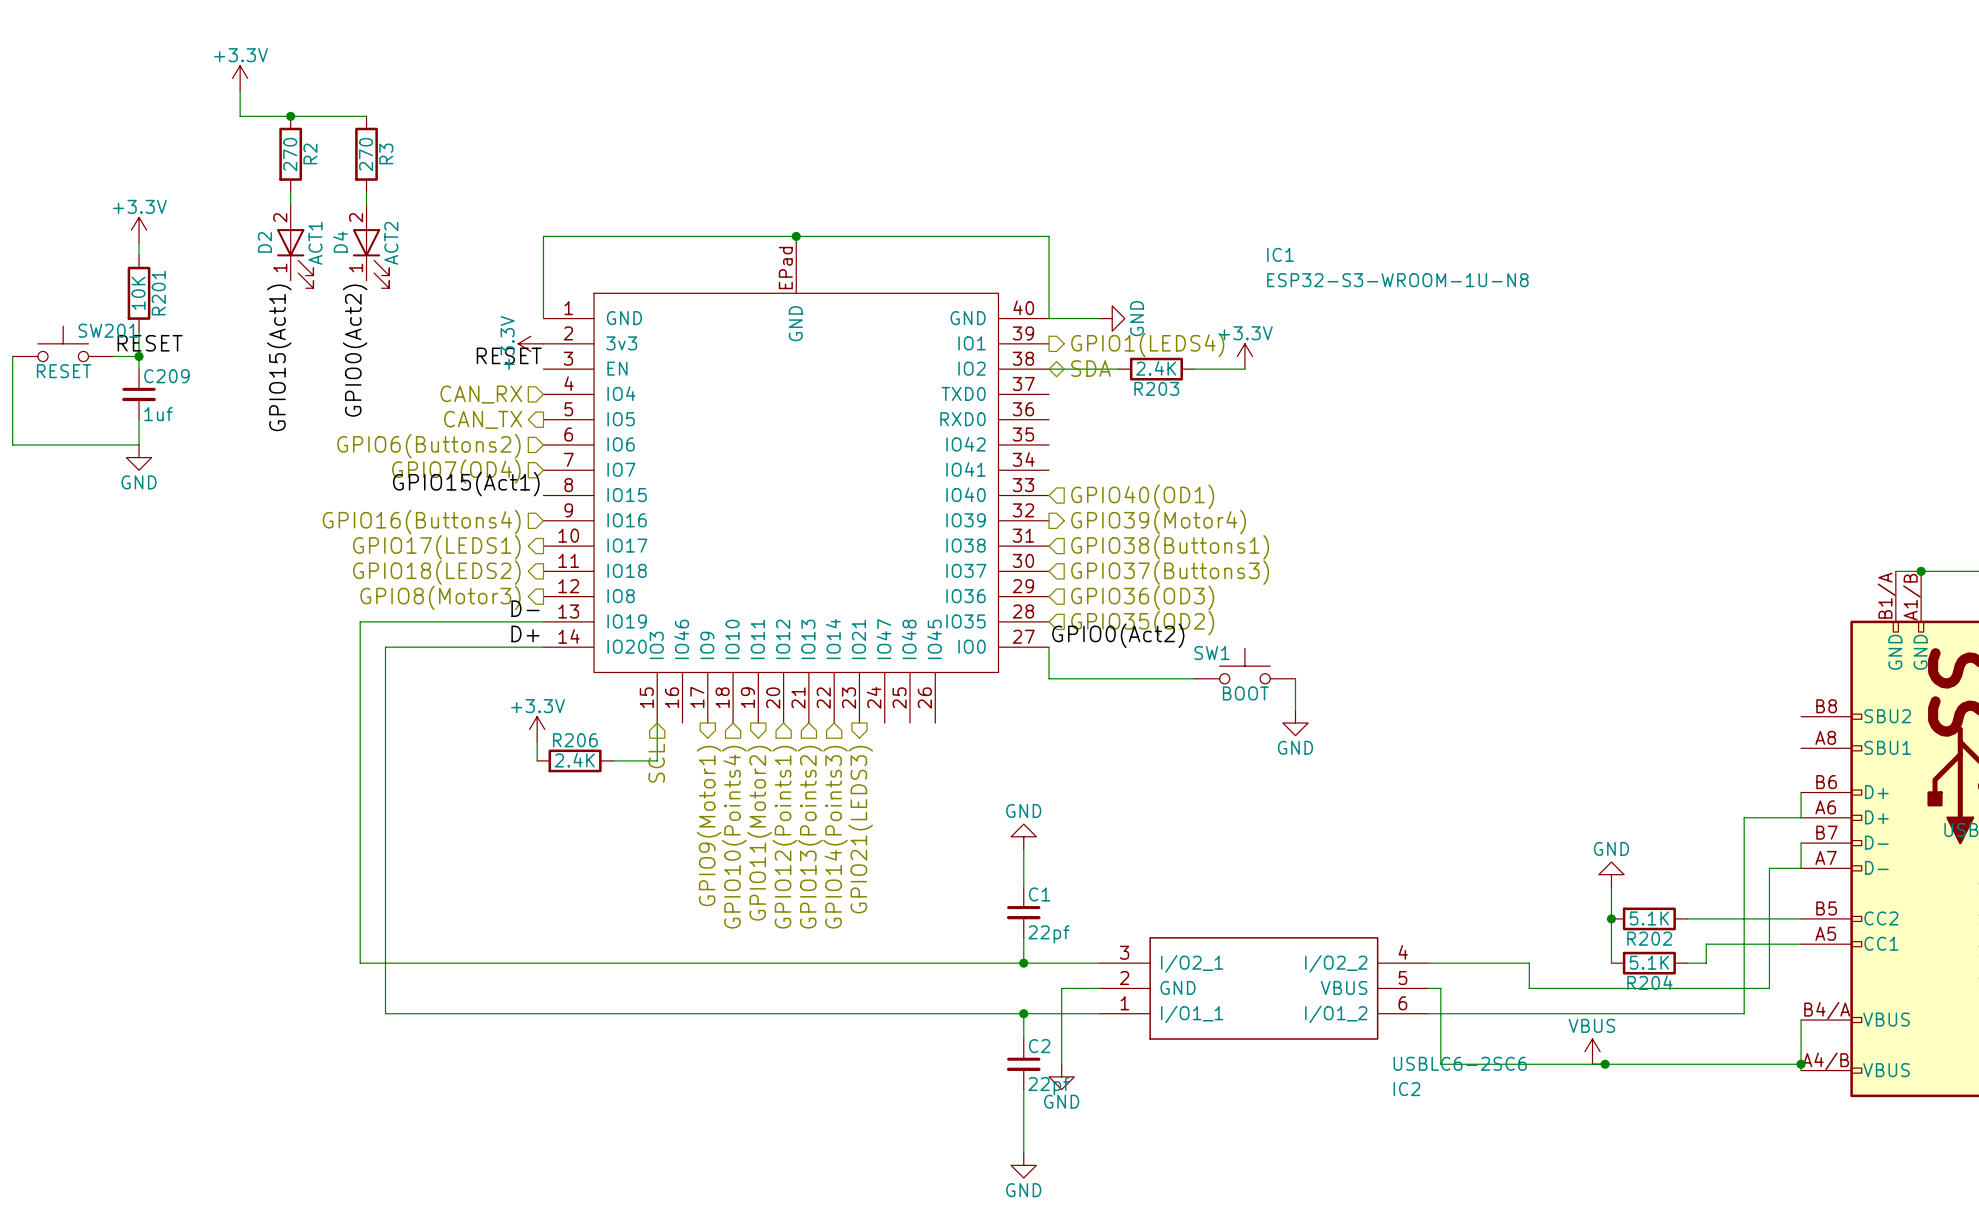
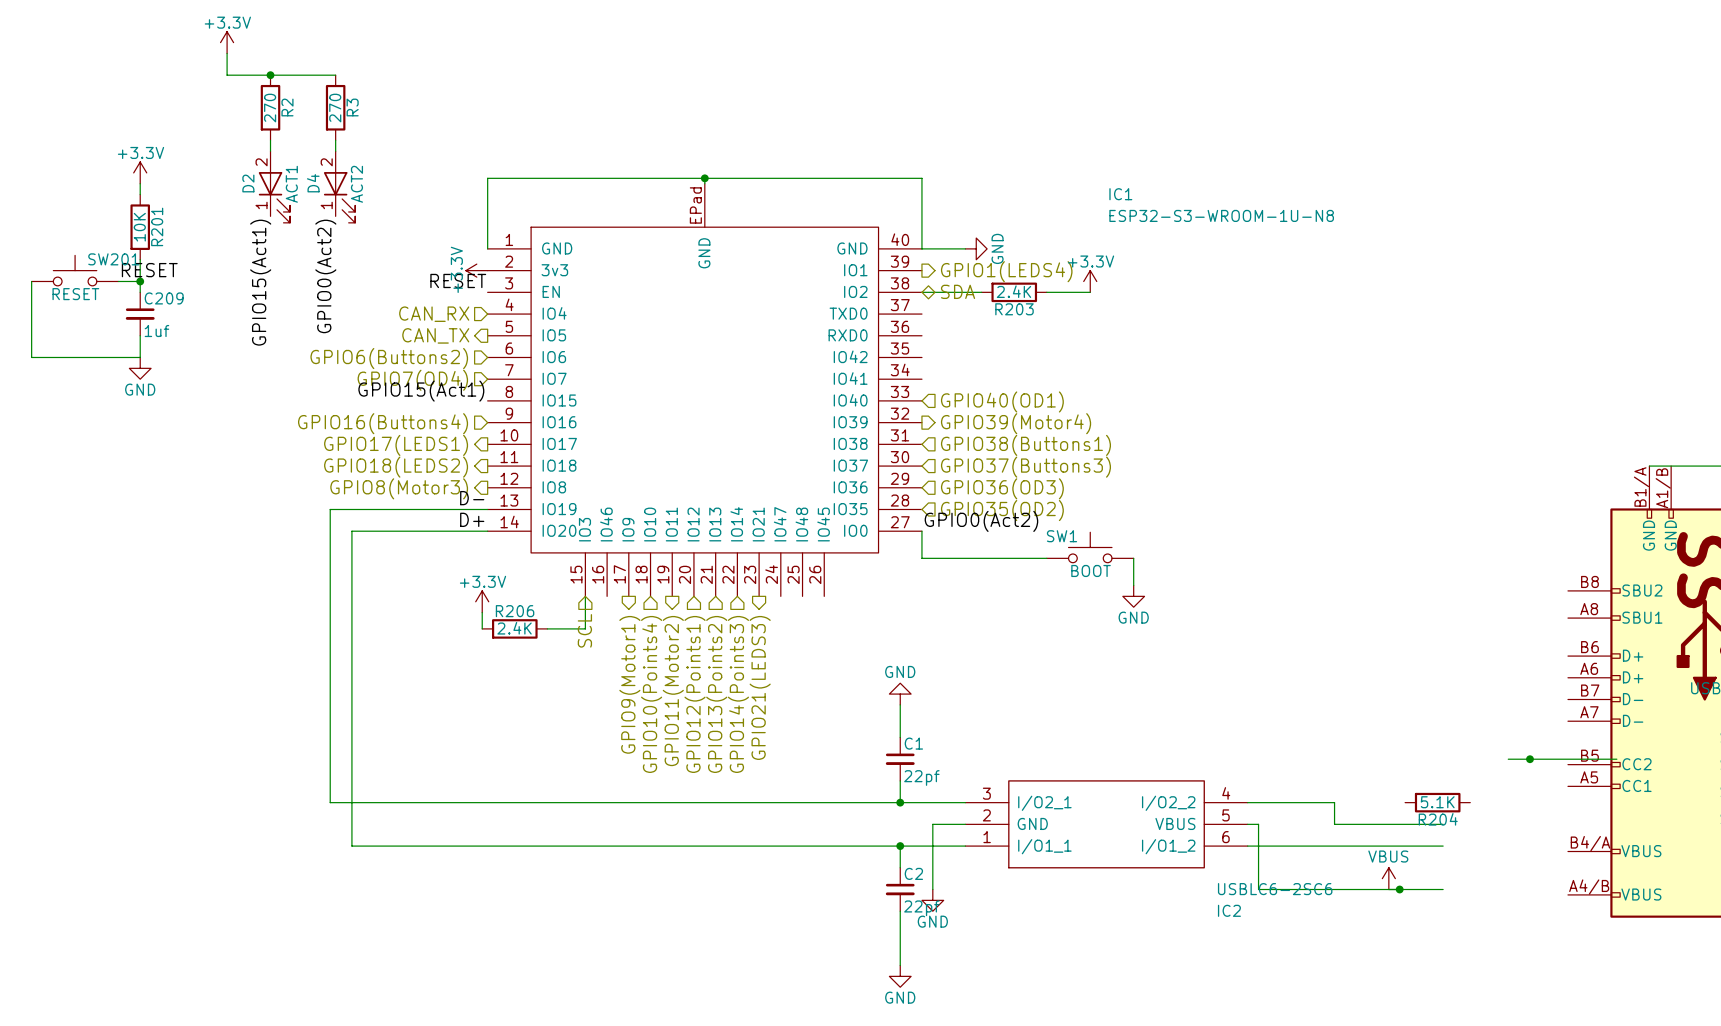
junction: (1921, 571) -> none
wire: (1801, 792) (1801, 817) (1744, 817) (1744, 1013) (1655, 1013) -> none
wire: (1801, 843) (1801, 868) (1769, 868) (1769, 988) (1655, 988) -> none
power symbol: GND (1611, 874) -> none
wire: (1611, 887) (1611, 963) -> none
wire: none -> (1508, 759) (1616, 759)
junction: none -> (1529, 759)
junction: (1611, 918) -> none
R202: 5.1K (1649, 918) -> none
wire: (1687, 918) (1801, 918) -> none
wire: (1801, 944) (1706, 944) (1706, 963) (1687, 963) -> none
wire: (1801, 1020) (1801, 1070) -> none
wire: (1655, 1064) (1801, 1064) -> none
junction: (1801, 1064) -> none

